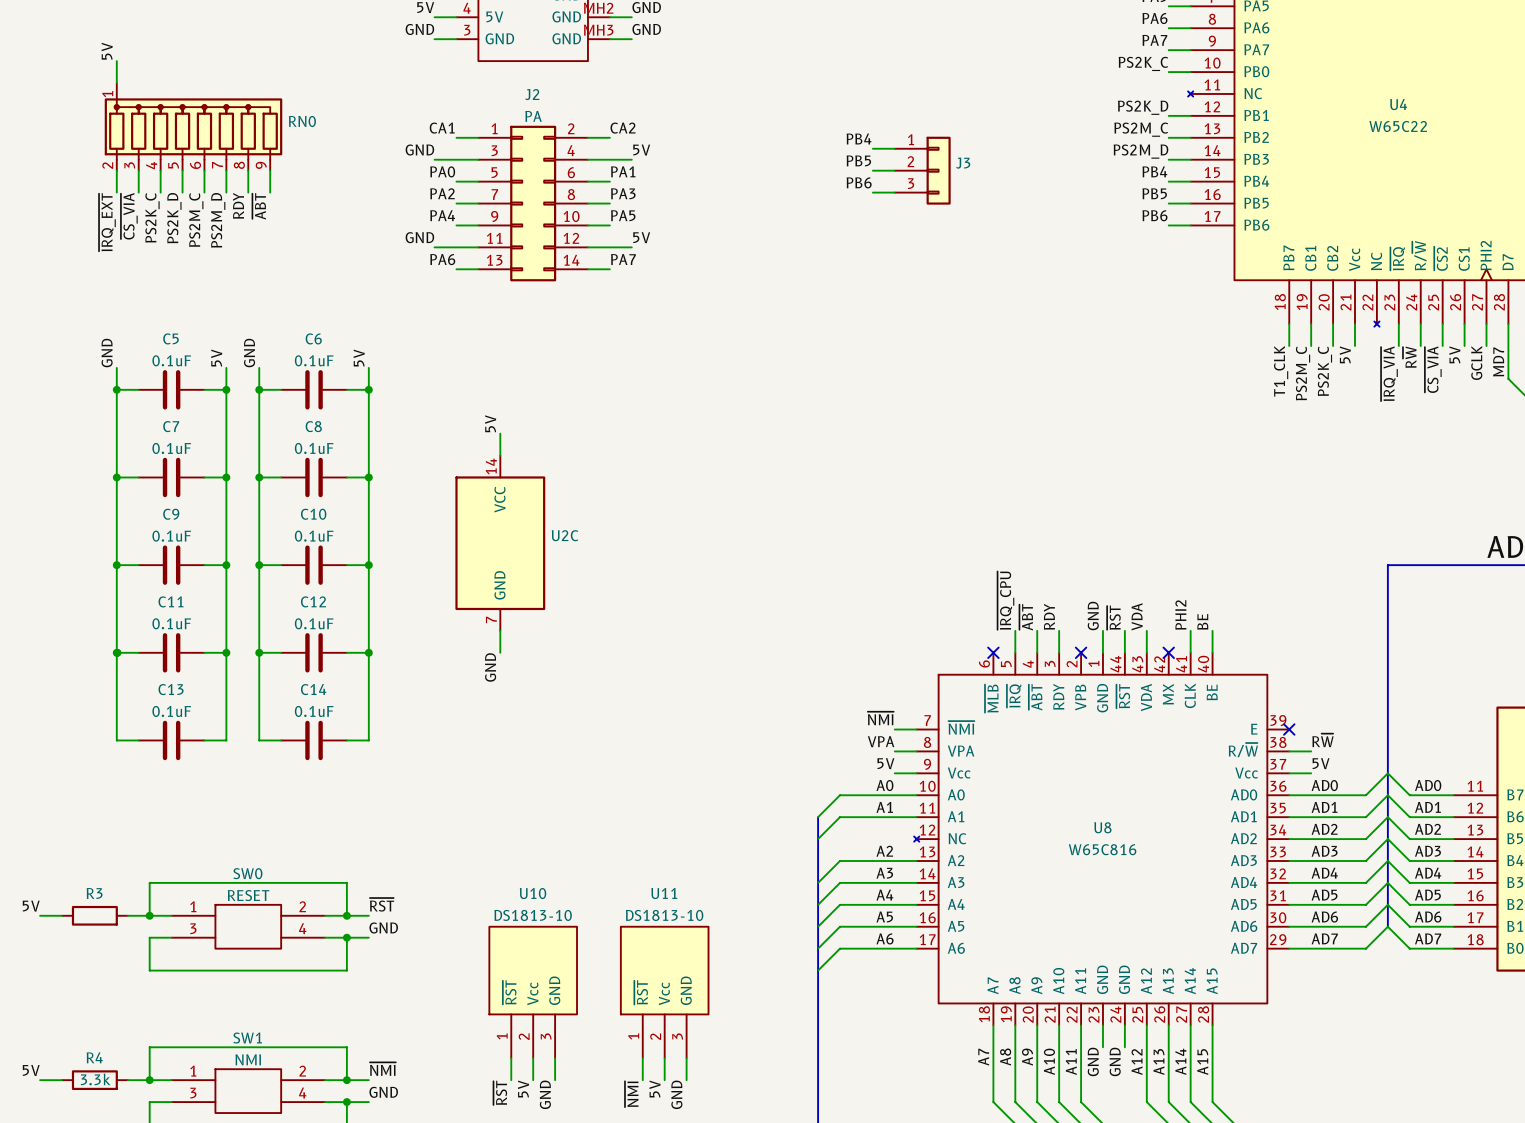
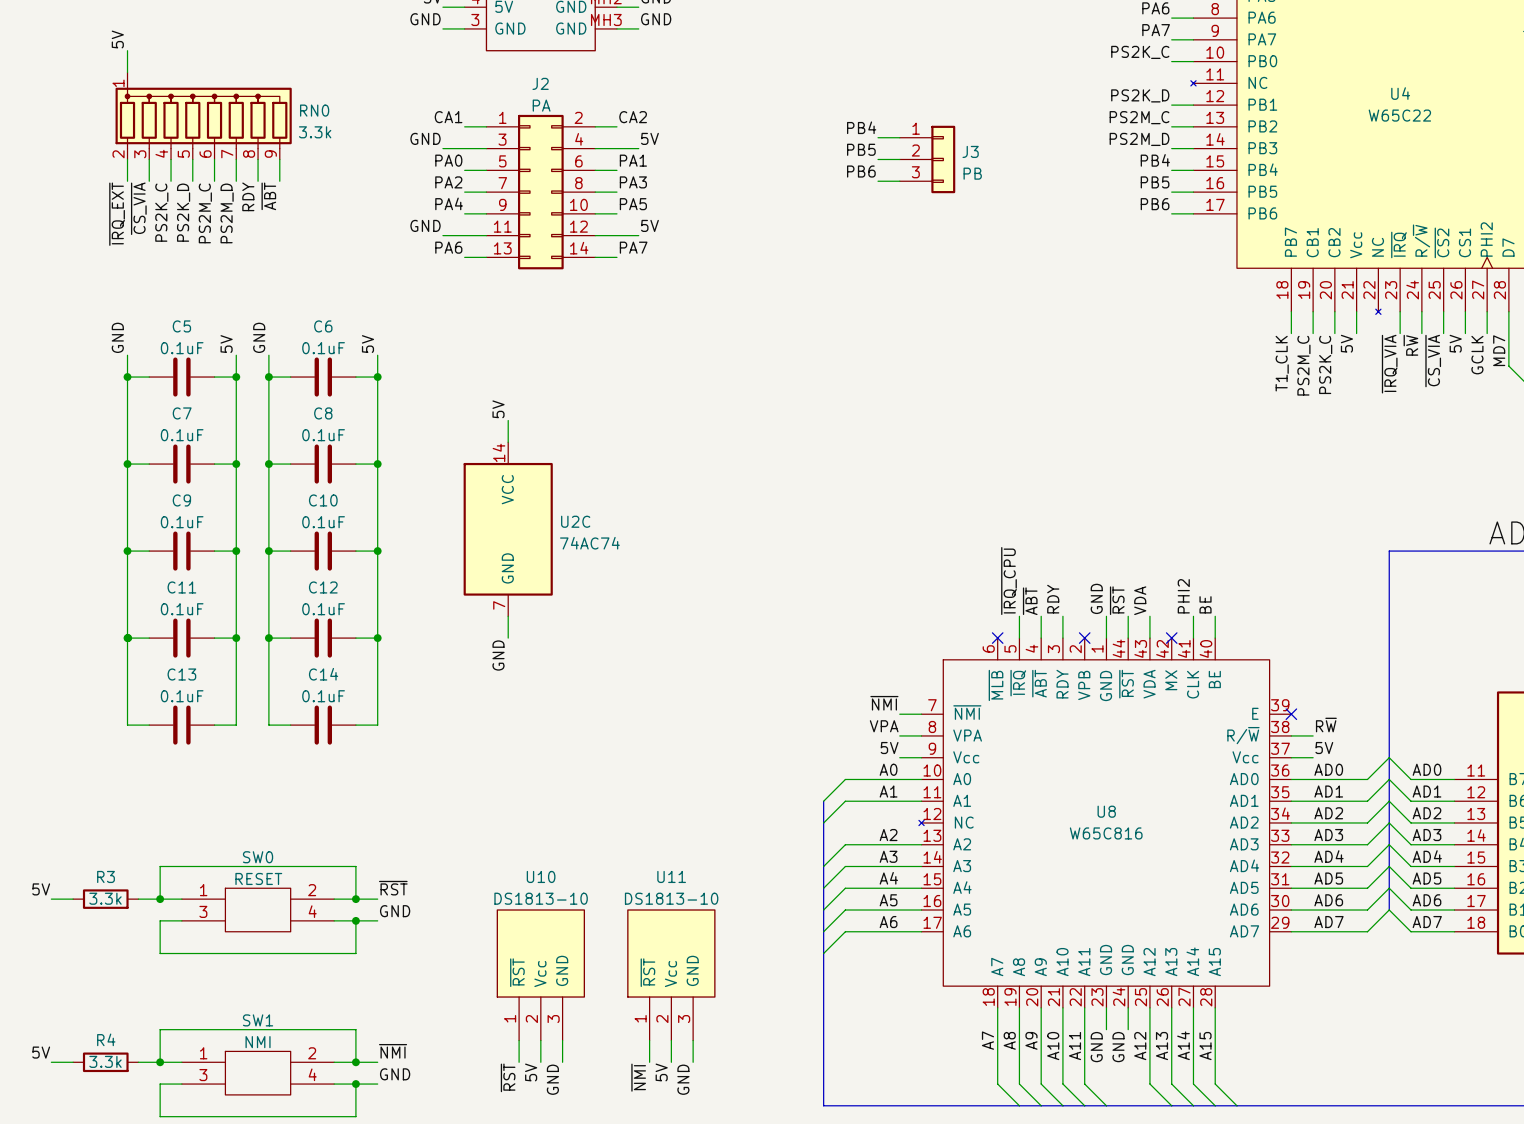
RN0 value: none -> 3.3k (315, 132)
J3 value: none -> PB (972, 173)
U2C value: none -> 74AC74 (589, 543)
R3 value: none -> 3.3k (105, 898)

